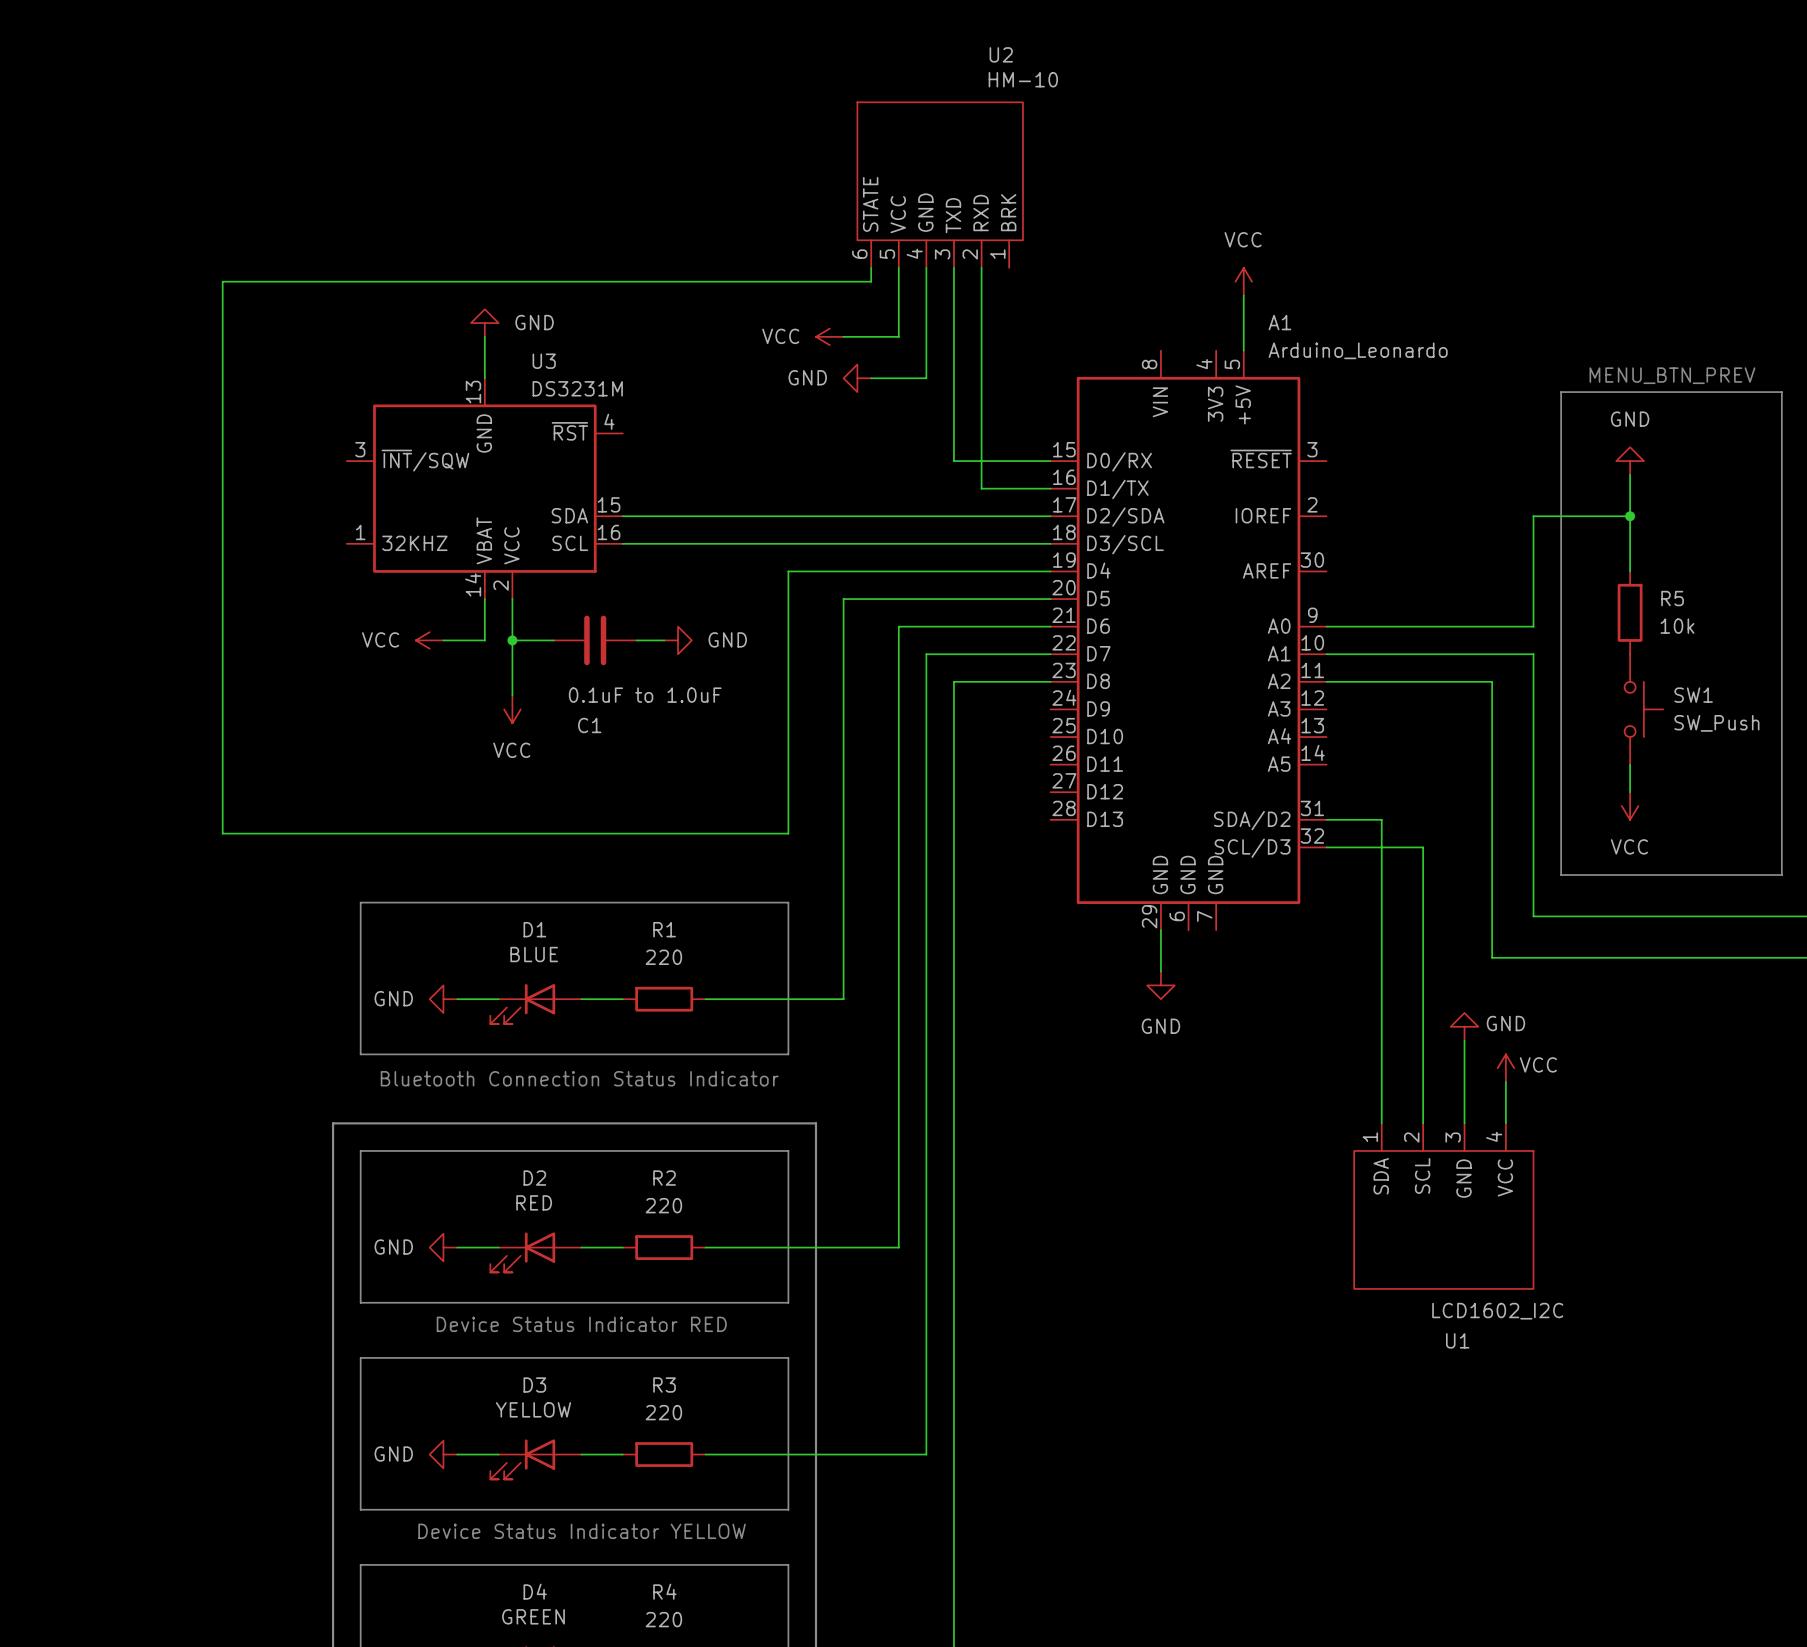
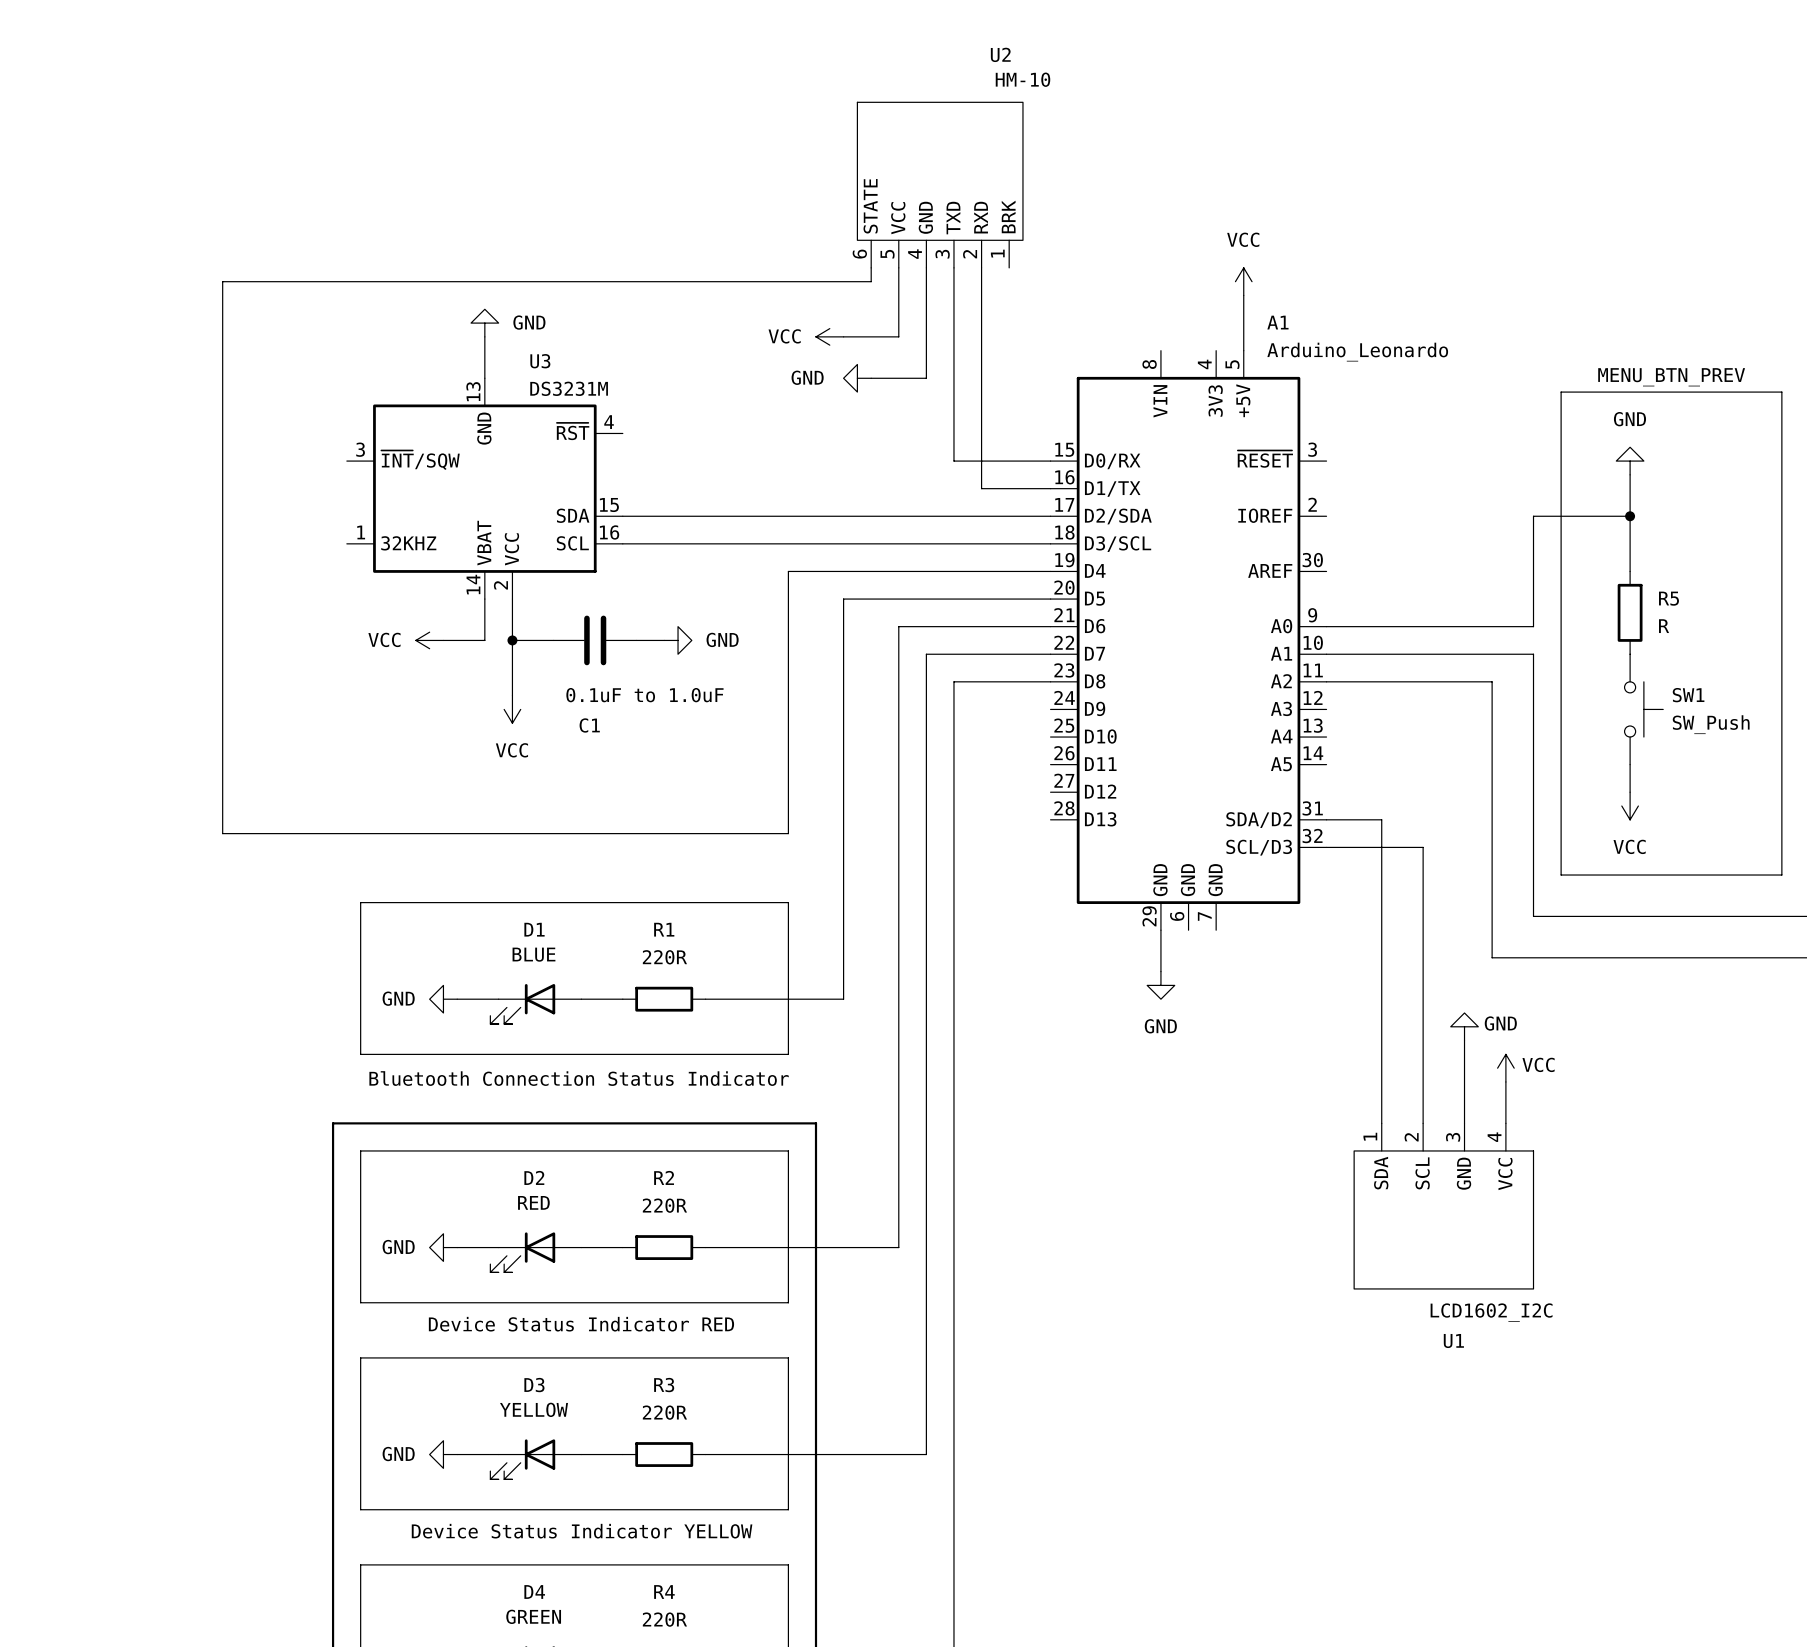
R5 value: 10k (1677, 626) -> R (1664, 626)
R1 value: 220 (663, 957) -> 220R (664, 957)
R2 value: 220 (663, 1205) -> 220R (664, 1205)
R3 value: 220 (663, 1412) -> 220R (664, 1412)
R4 value: 220 (663, 1619) -> 220R (664, 1619)

